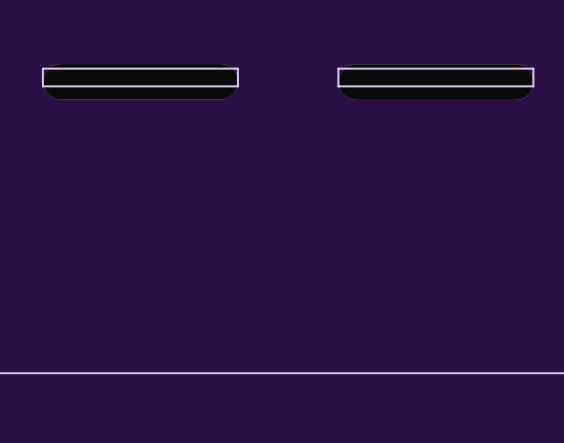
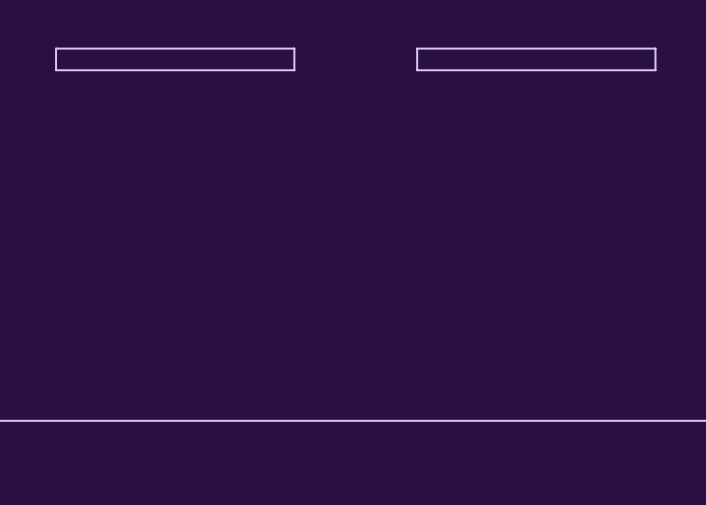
part: (140, 81) -> none
part: (436, 82) -> none

